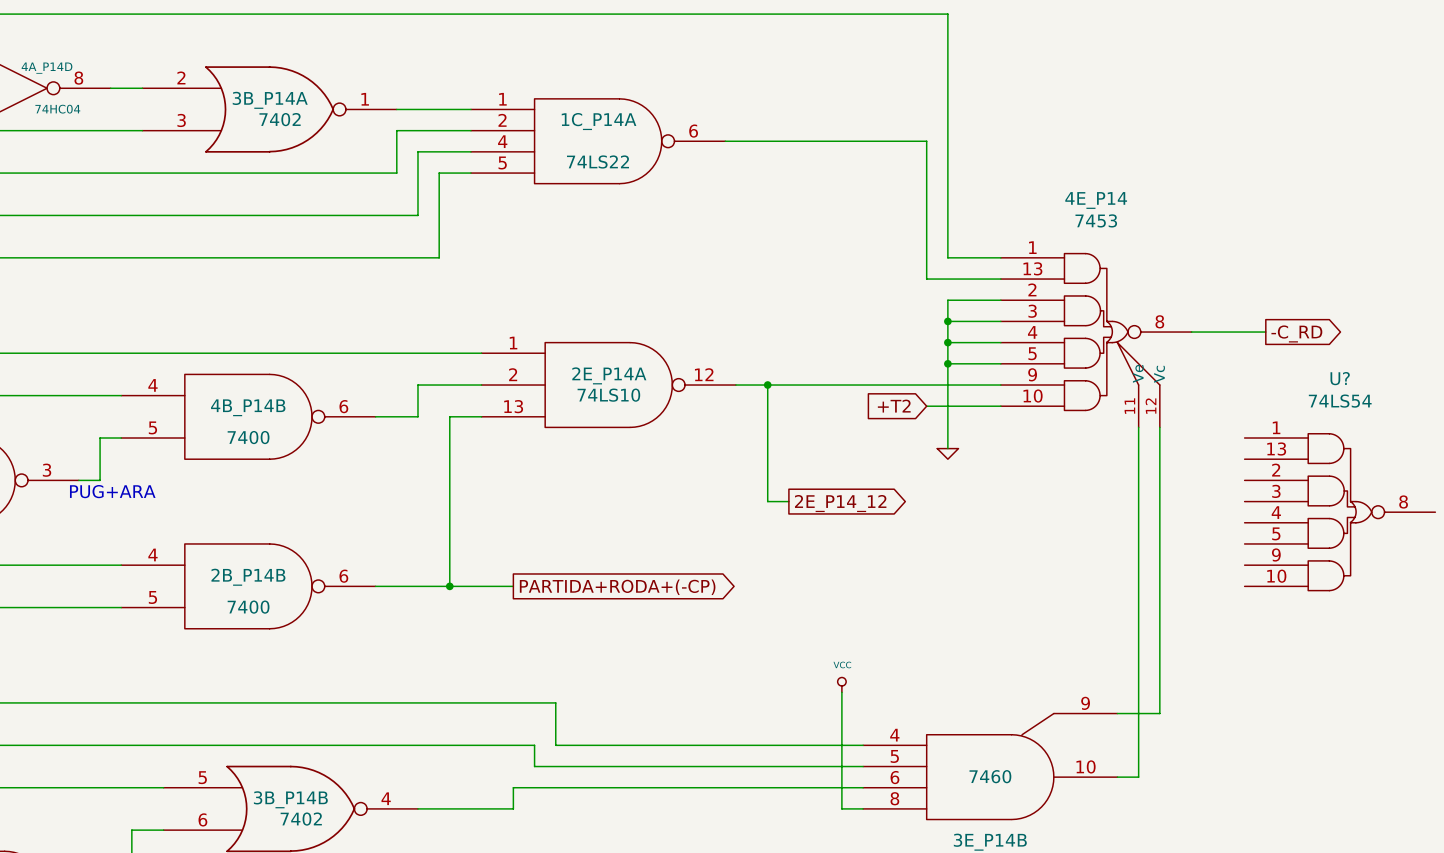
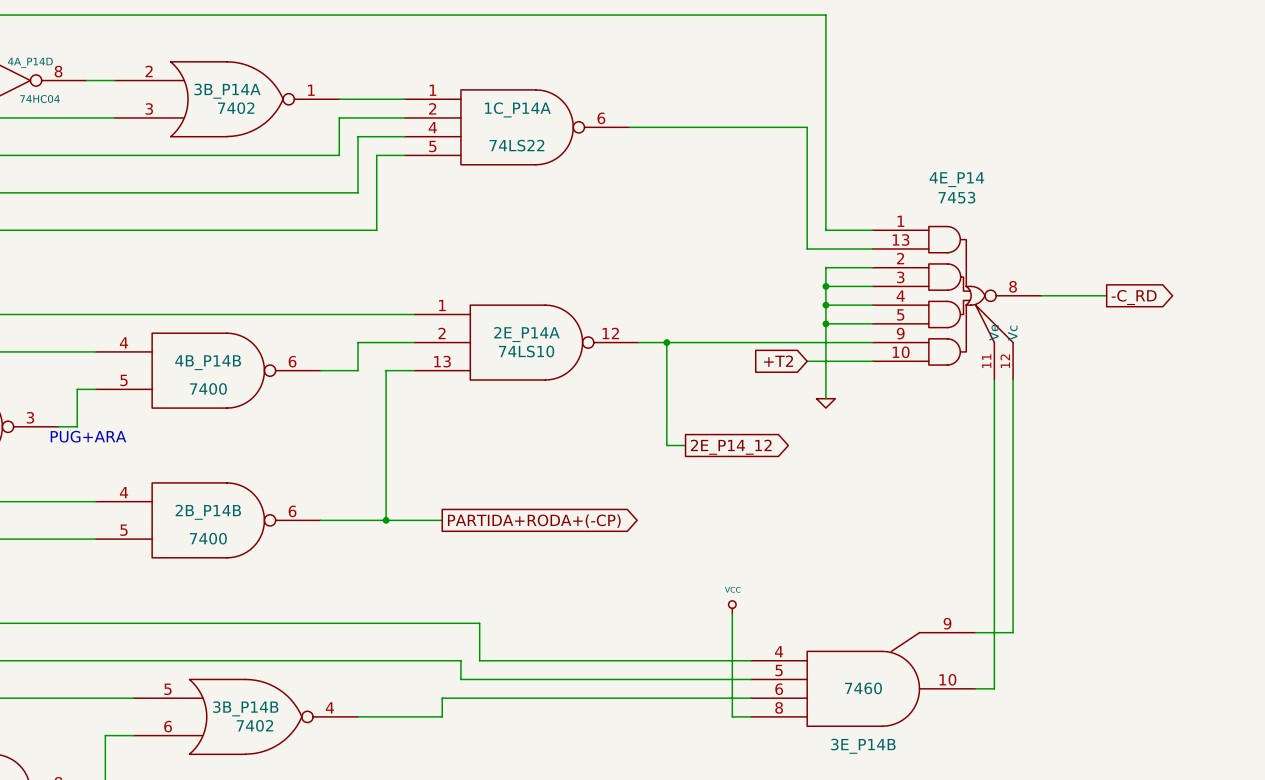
U?: 74LS54 (1340, 512) -> none

